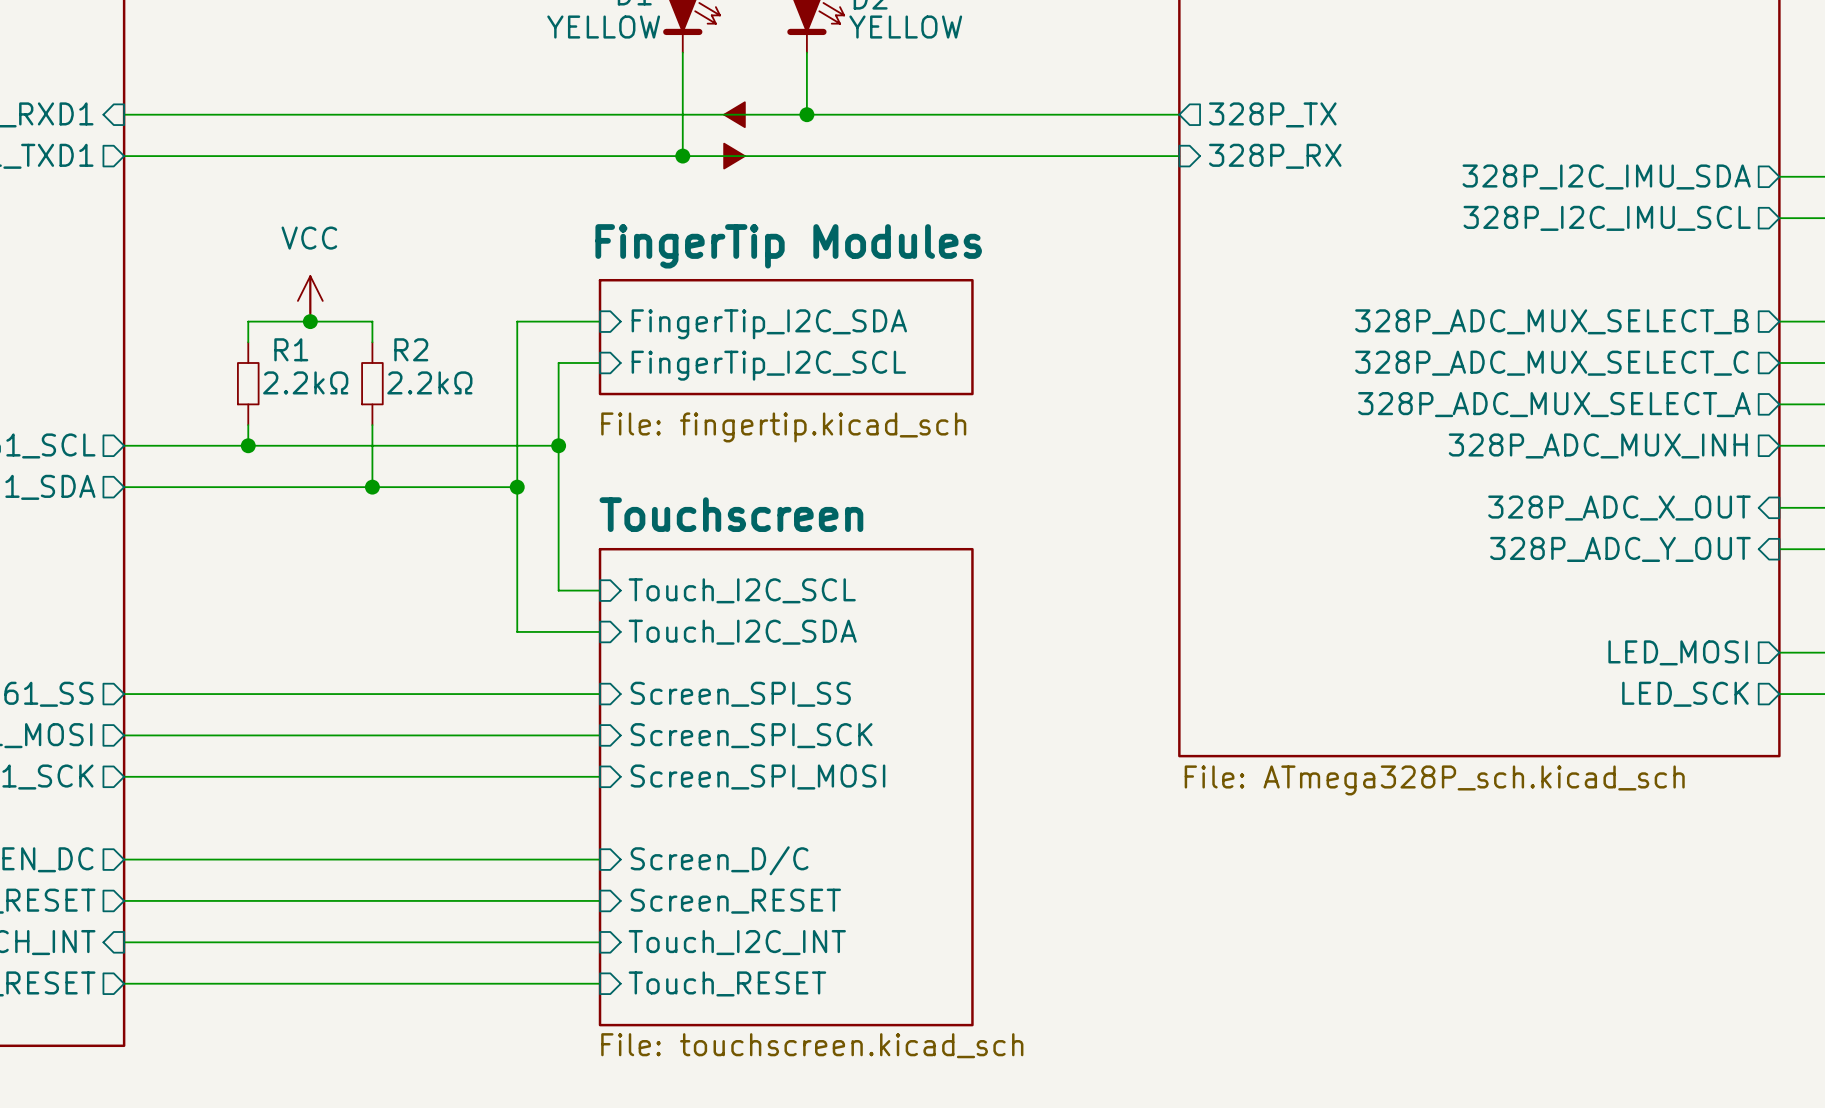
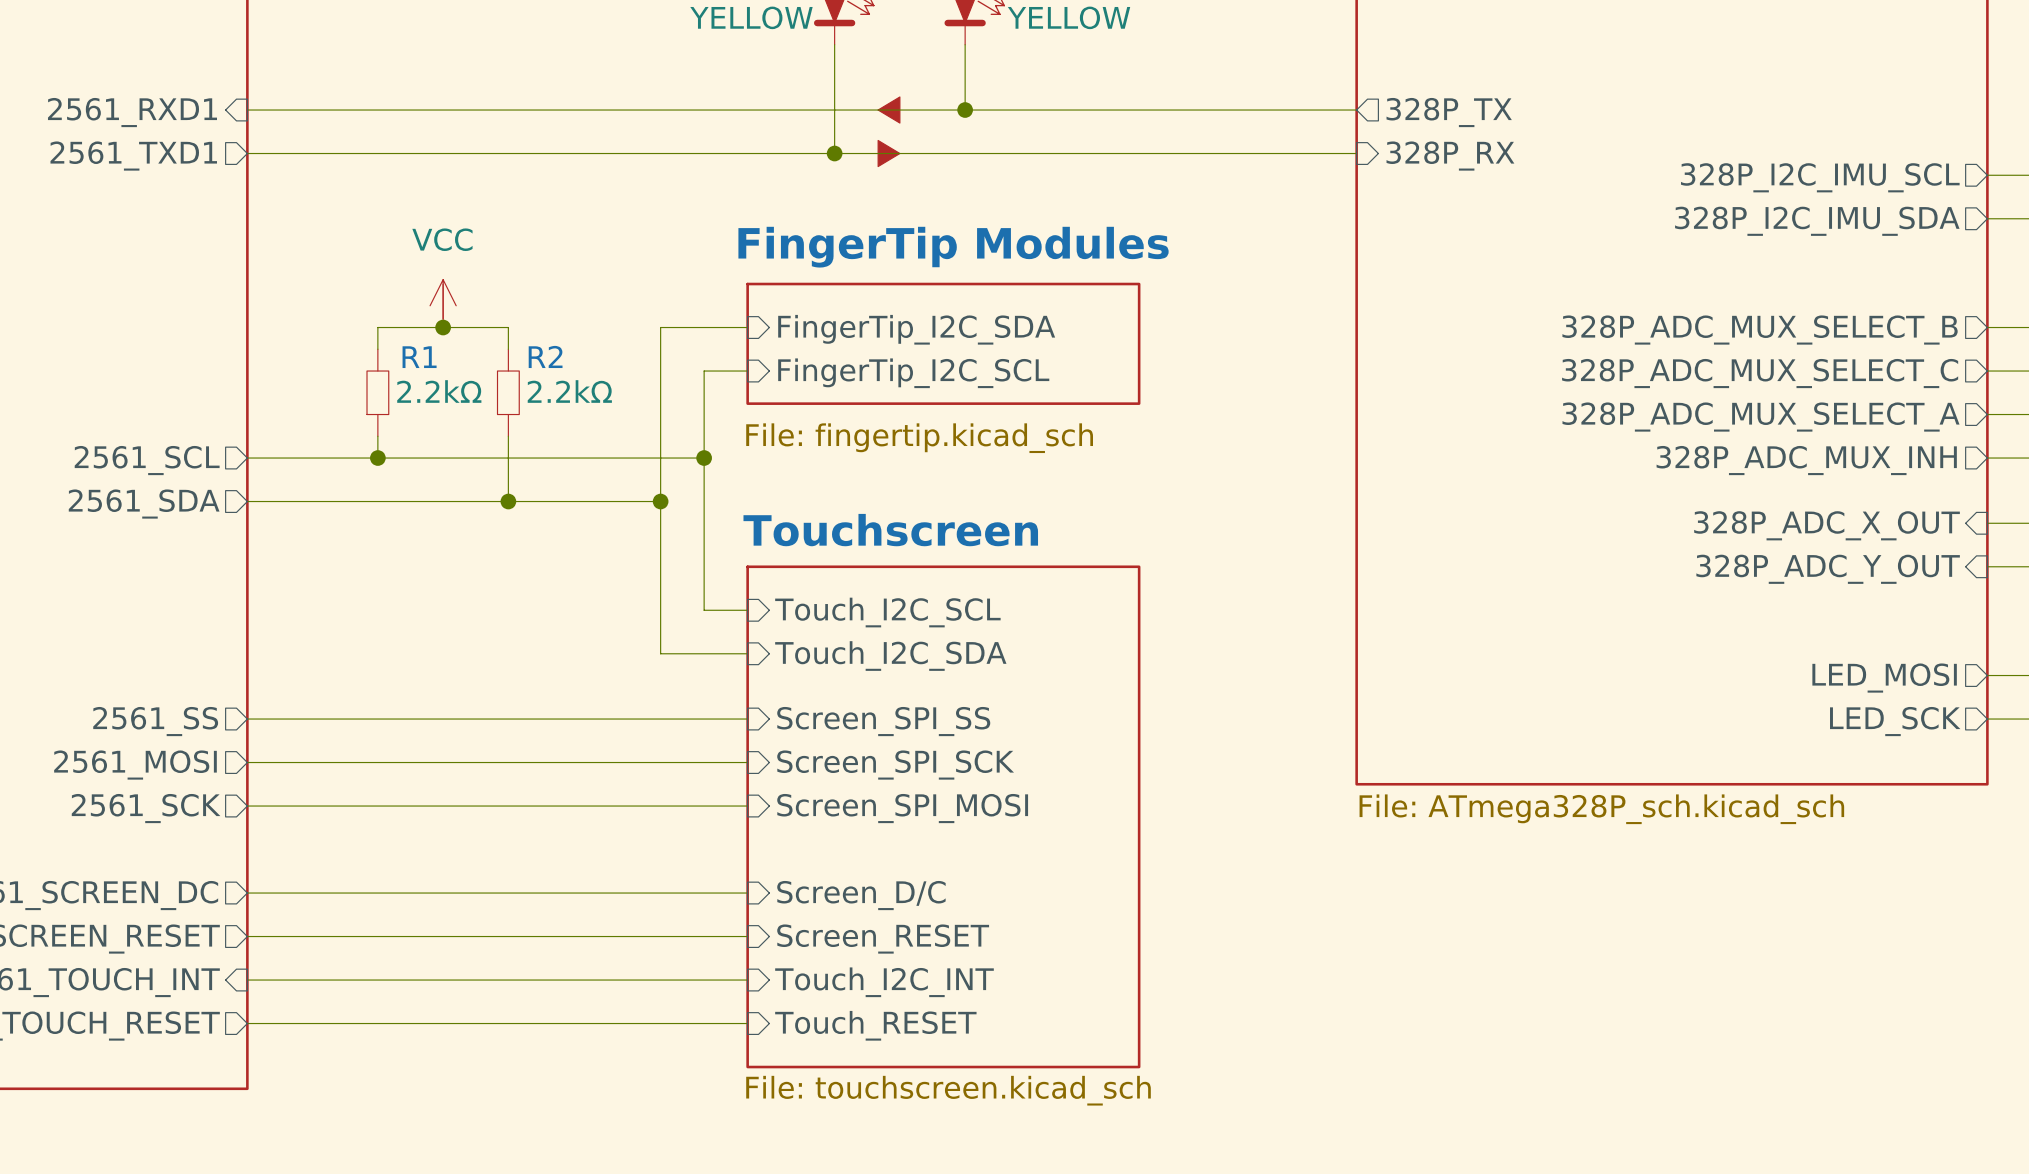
sheet pin: 328P_I2C_IMU_SDA (1606, 176) -> 328P_I2C_IMU_SCL (1820, 177)
sheet pin: 328P_I2C_IMU_SCL (1607, 218) -> 328P_I2C_IMU_SDA (1817, 221)

